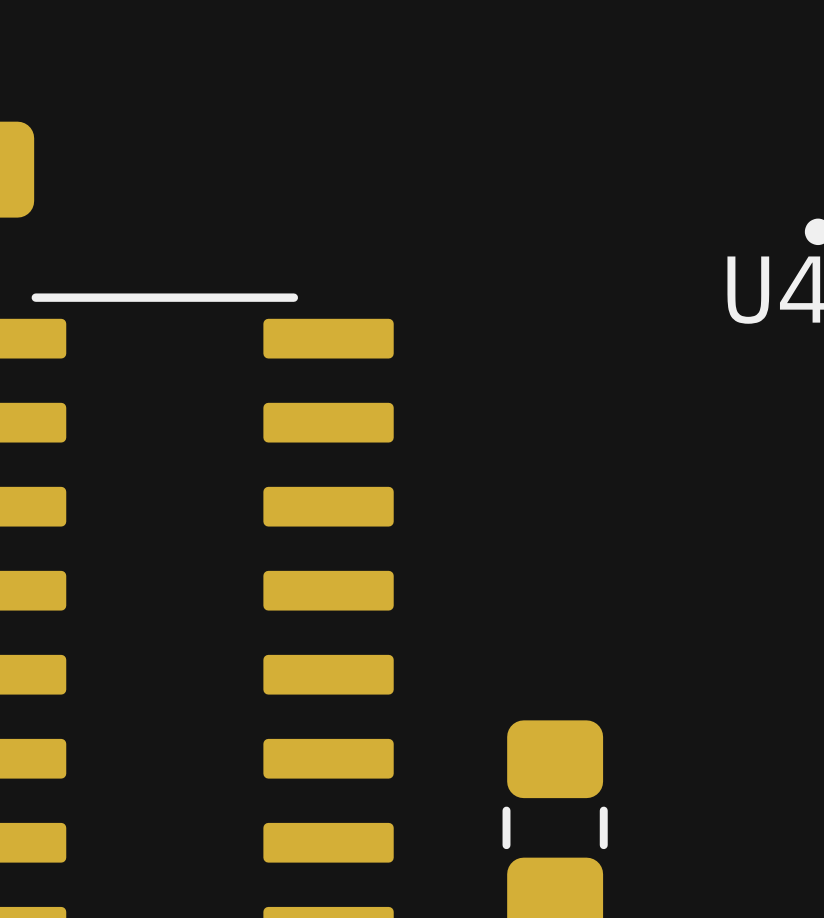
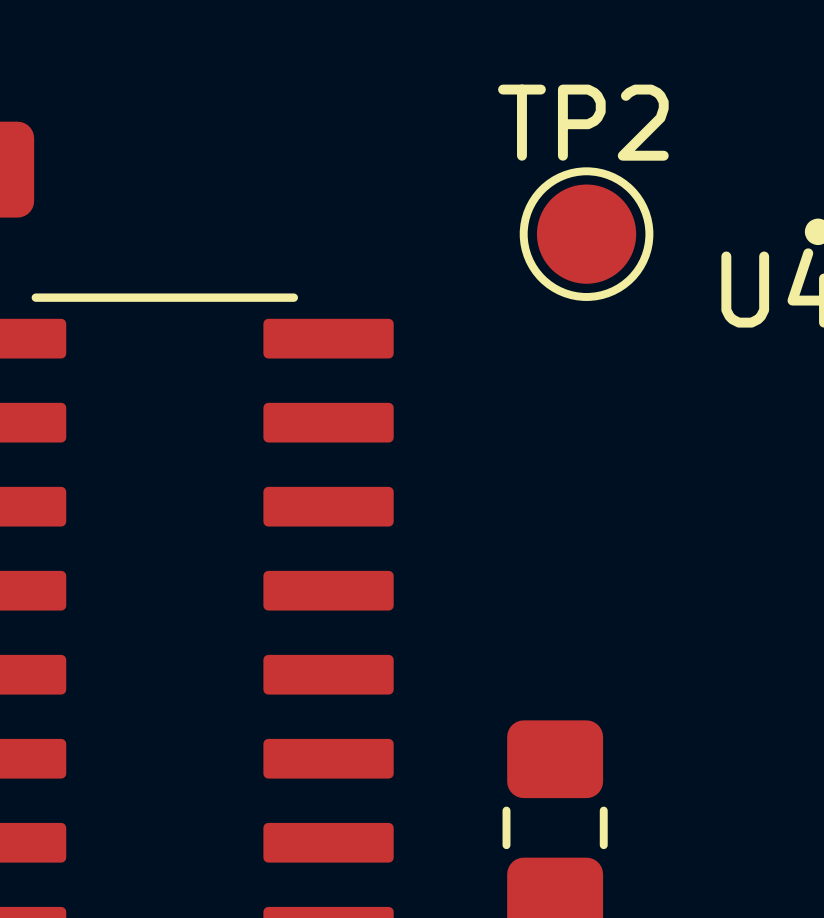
TP2: none -> (586, 234)

